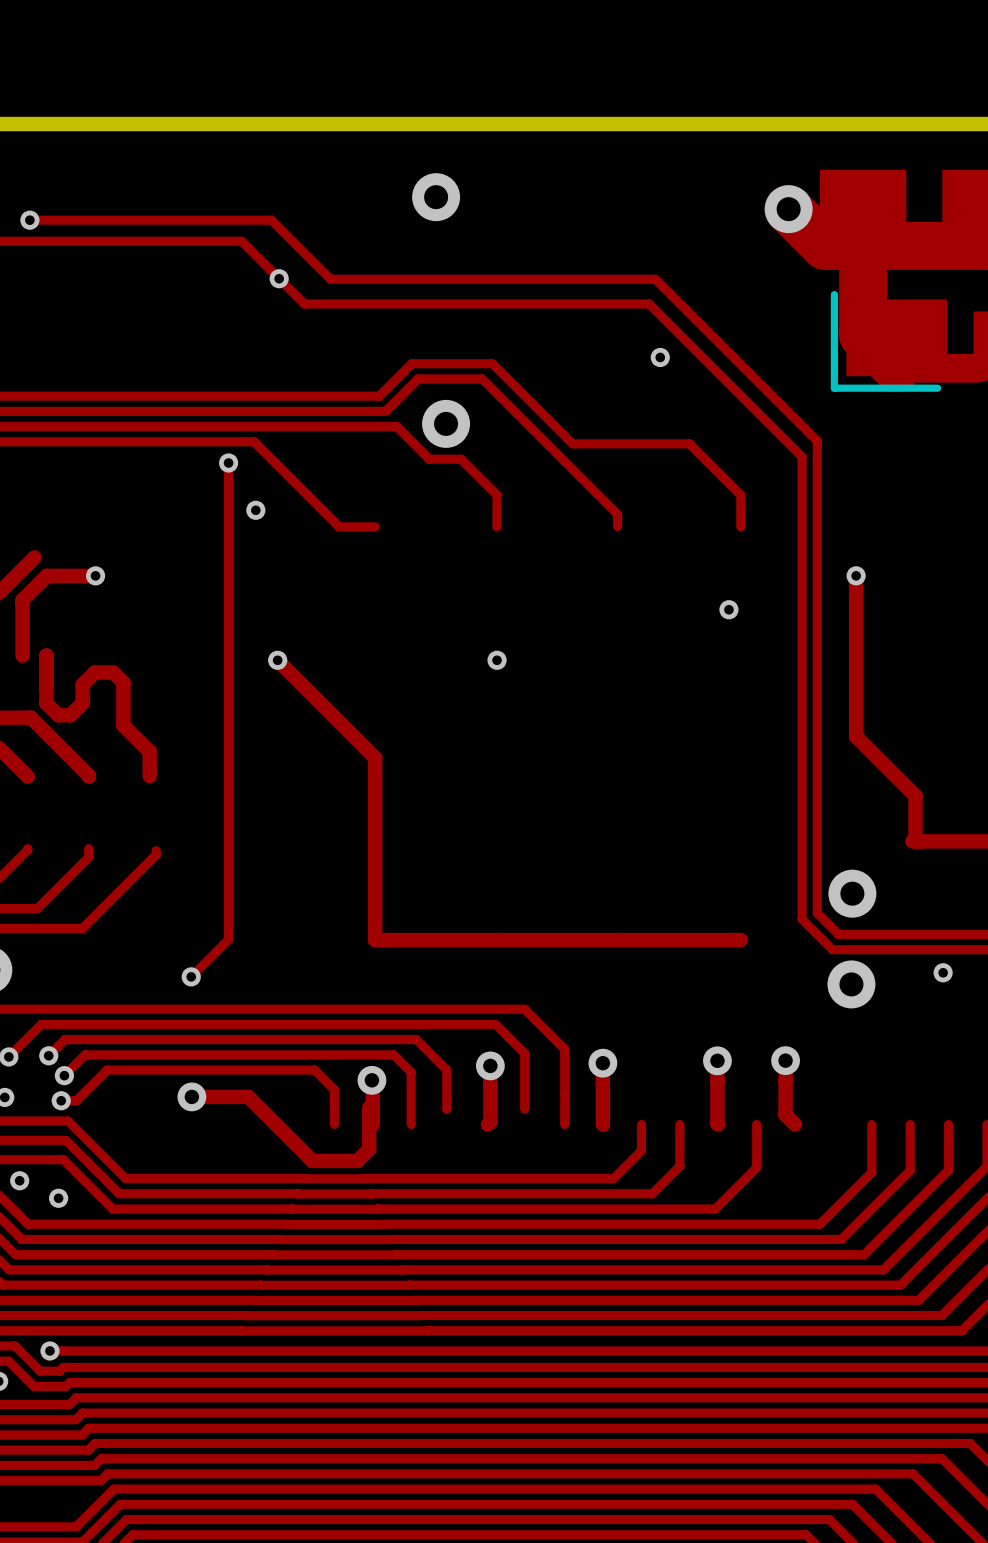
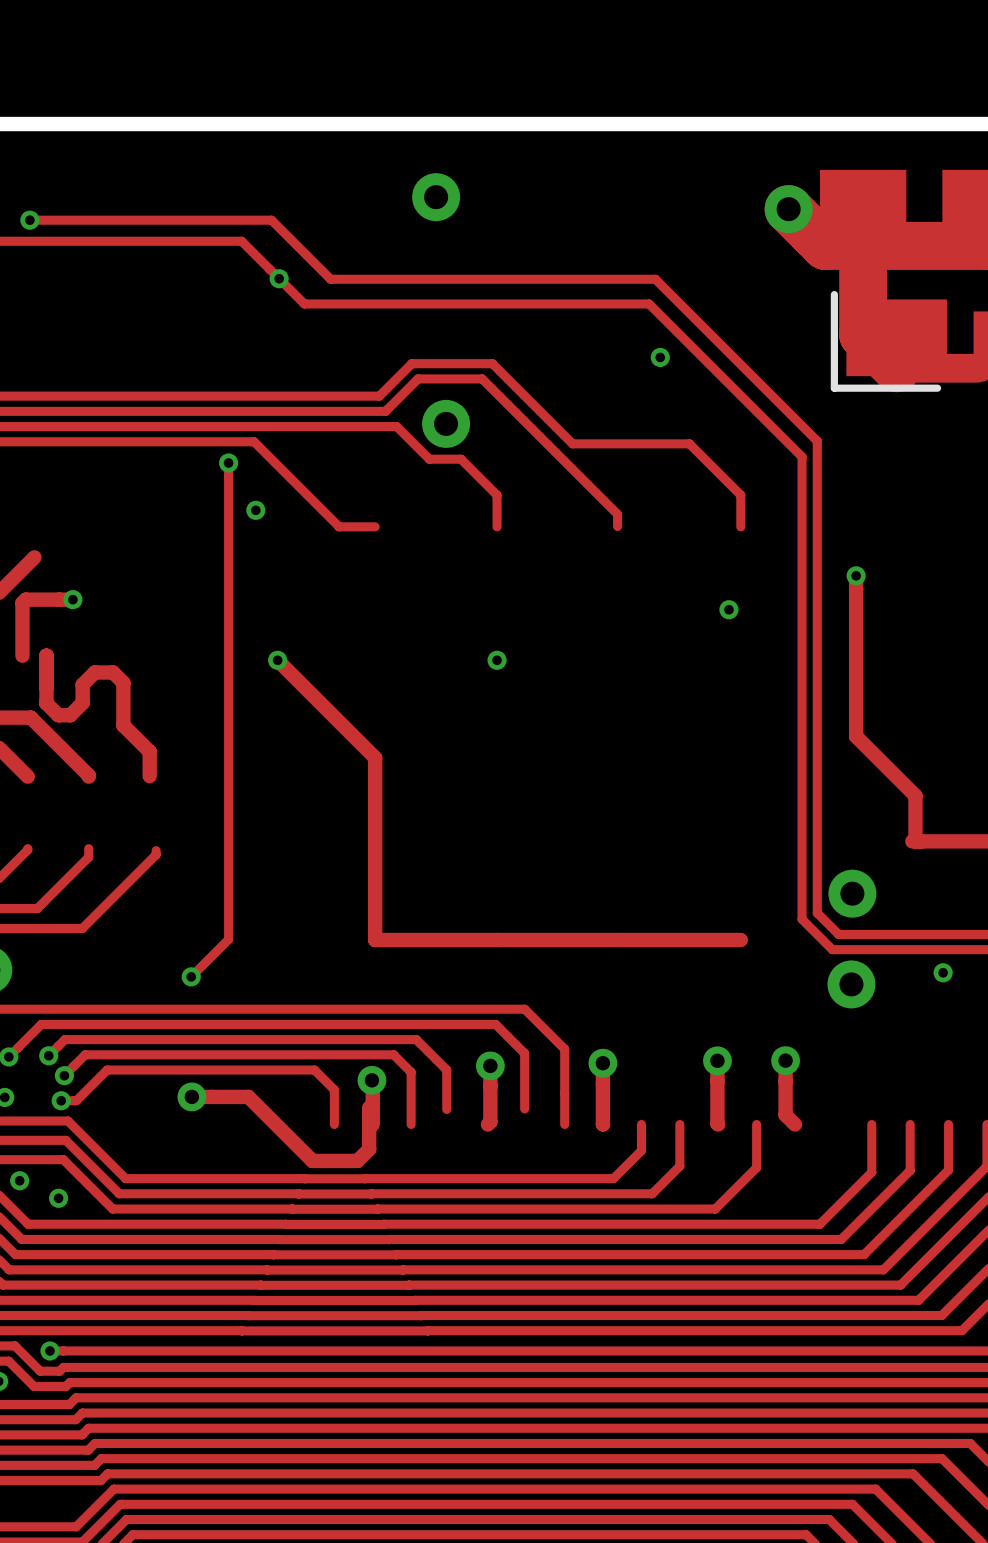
track: (95, 575) (46, 575) (22, 600) (22, 602) -> (72, 599) (25, 599) (22, 602)
via position: (95, 575) -> (72, 599)

